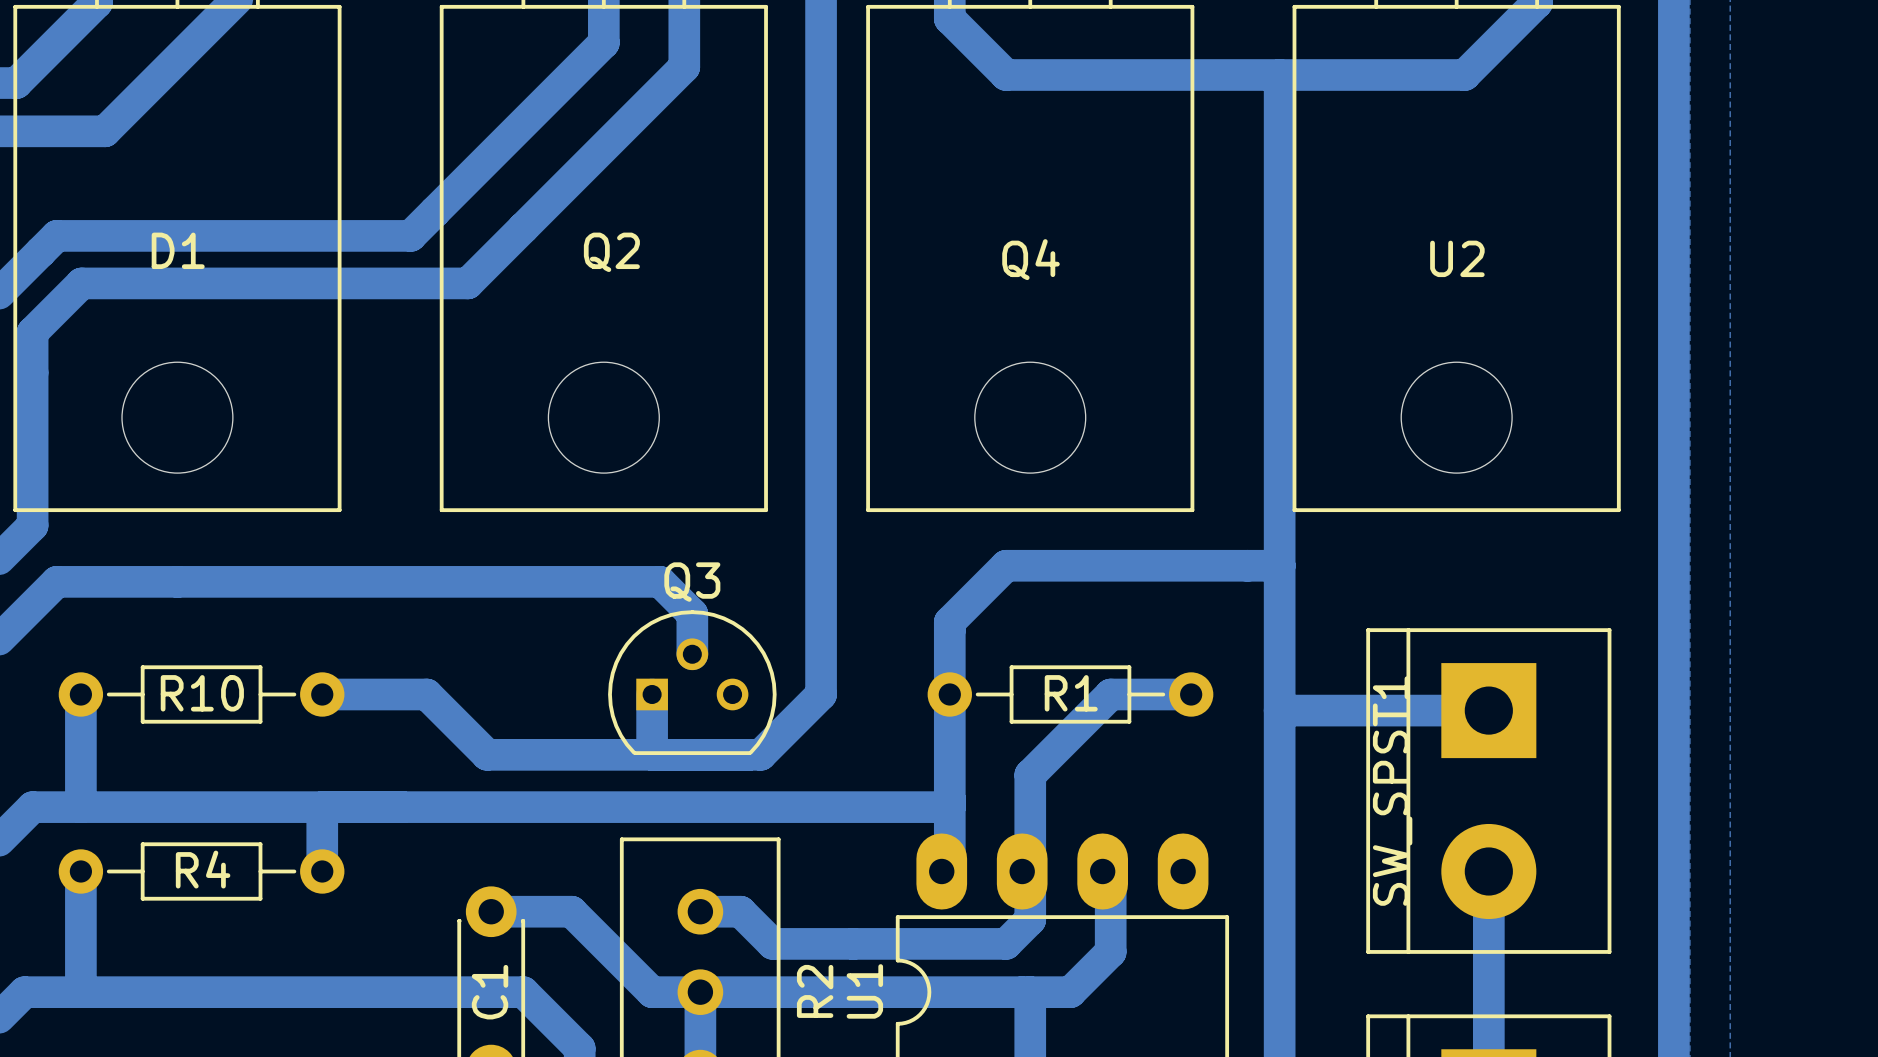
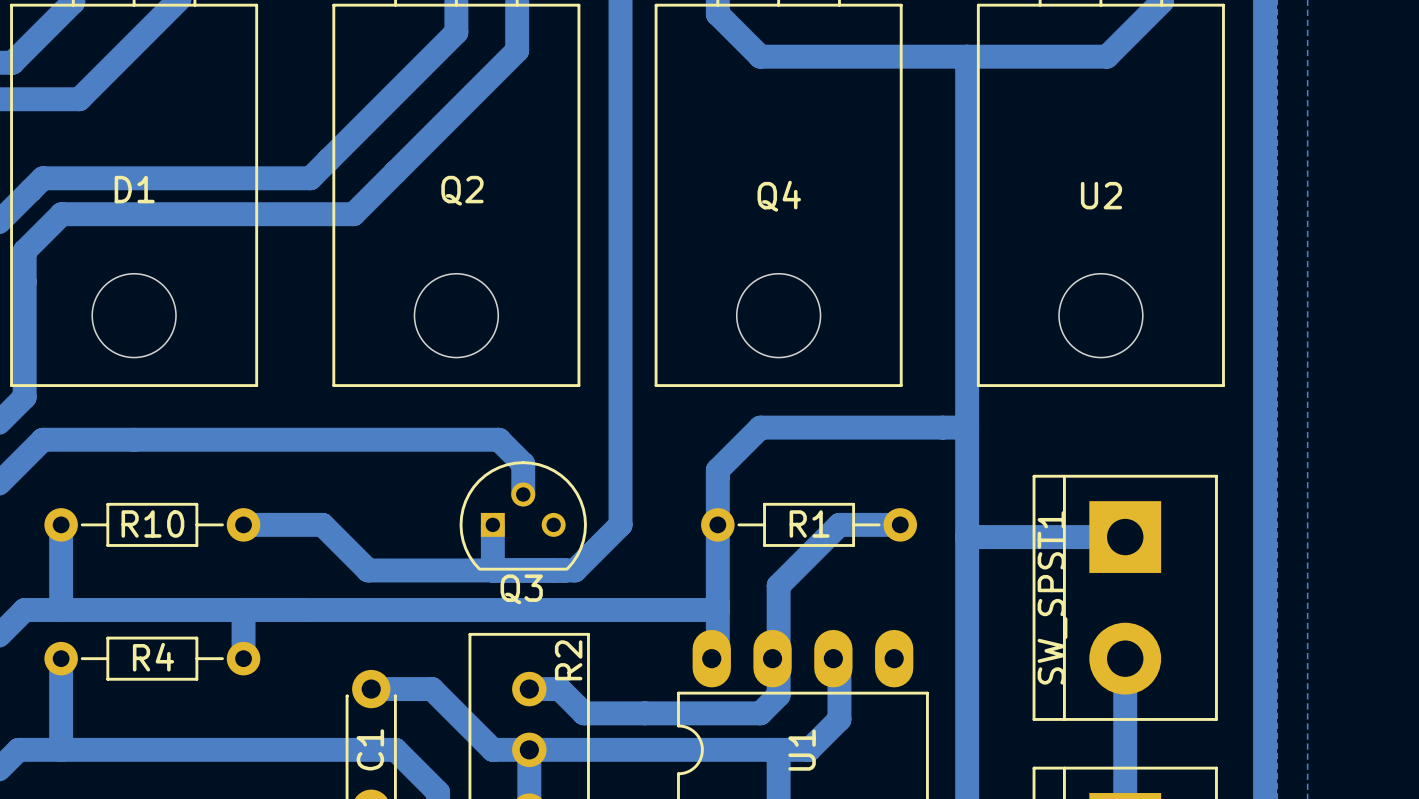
Q3 name position: Q3 (692, 582) -> Q3 (521, 589)
R2 name position: R2 (815, 991) -> R2 (568, 660)
U1 name position: U1 (864, 991) -> U1 (802, 750)

